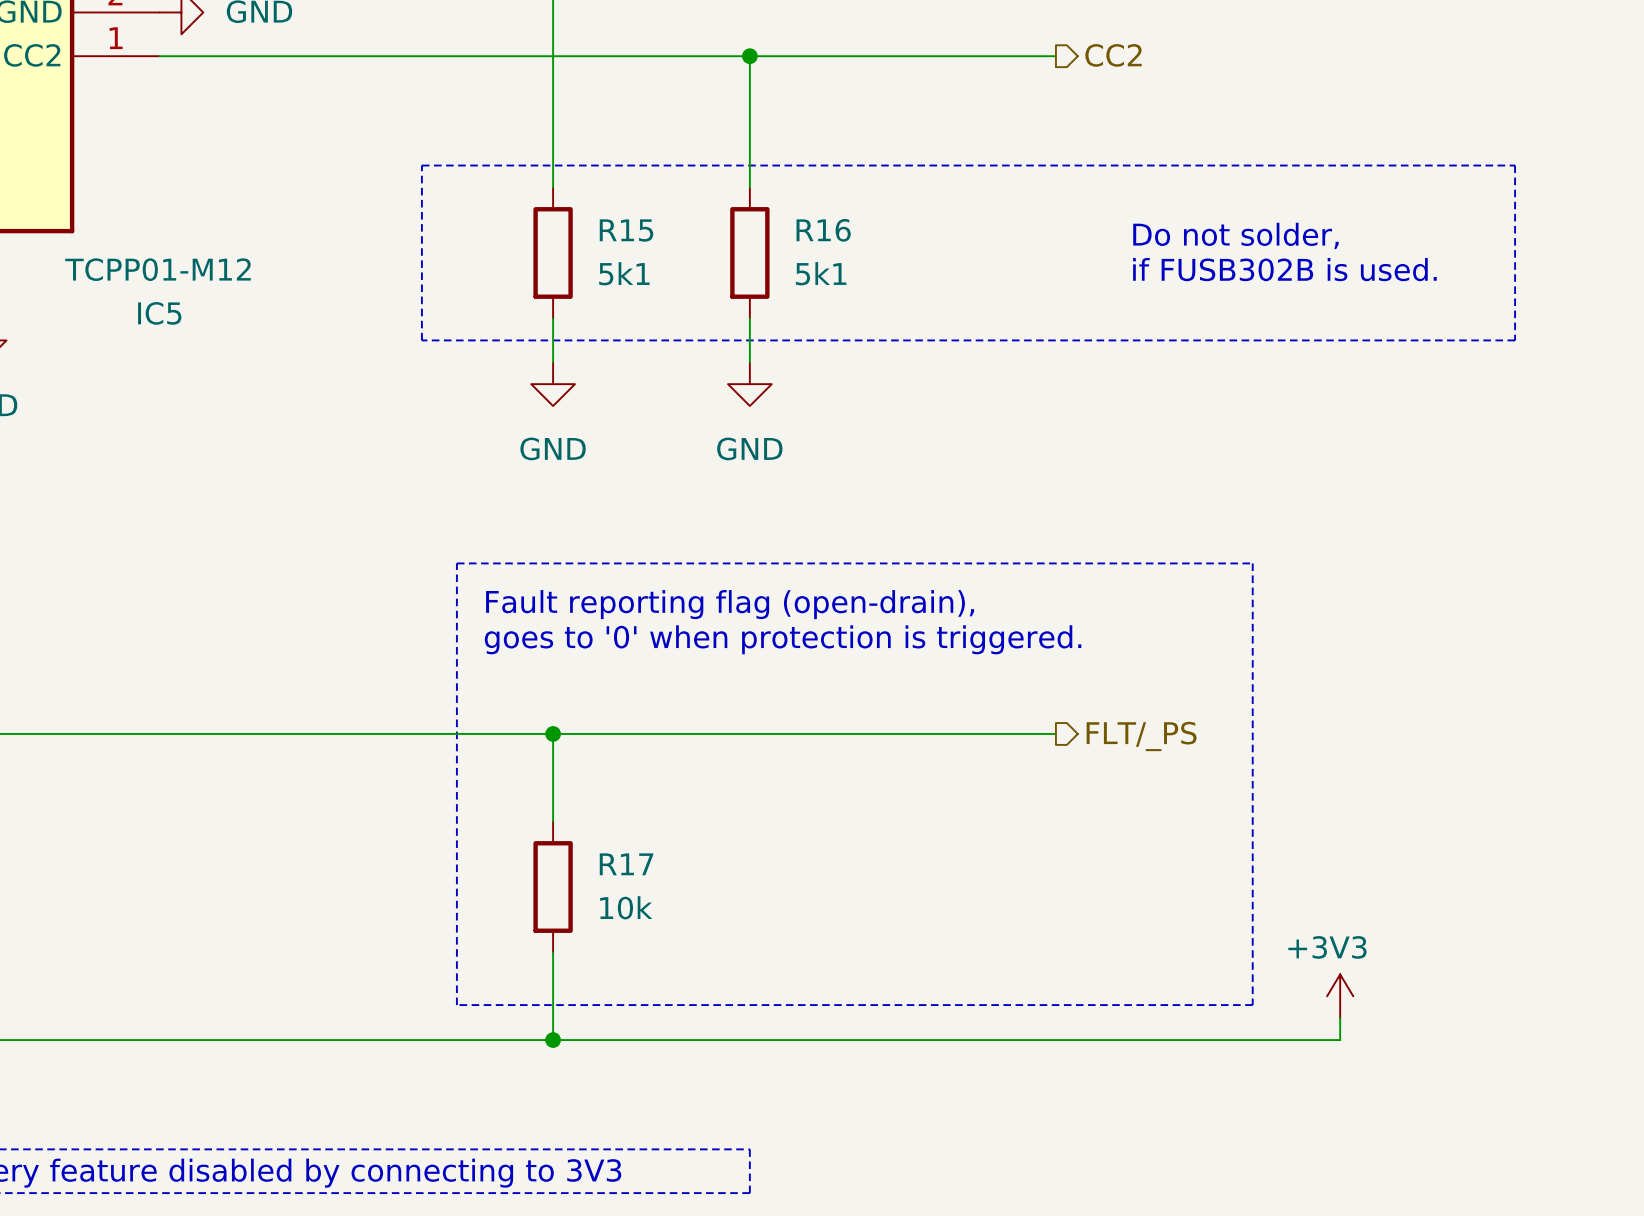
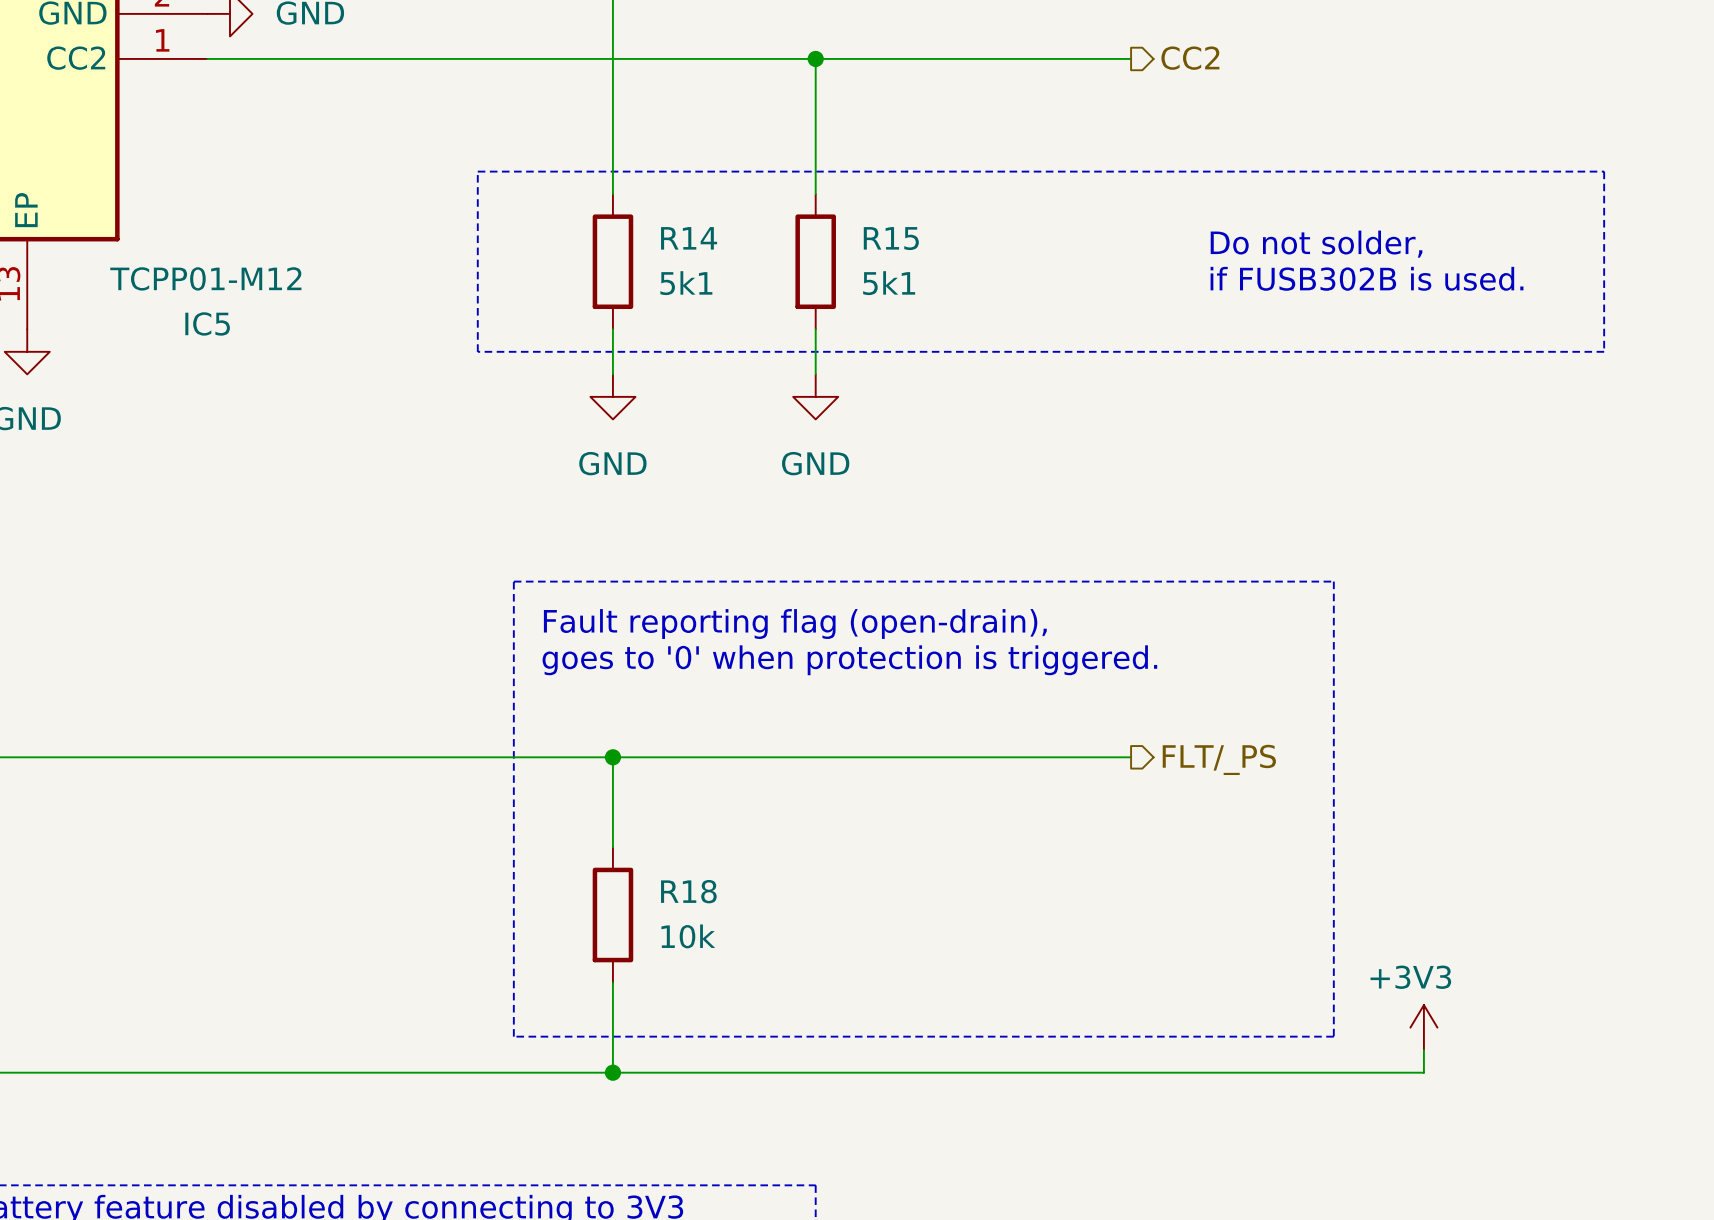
R15 name: R15 (626, 230) -> R14 (689, 238)
R16 name: R16 (823, 230) -> R15 (891, 238)
R17 name: R17 (626, 864) -> R18 (688, 891)

